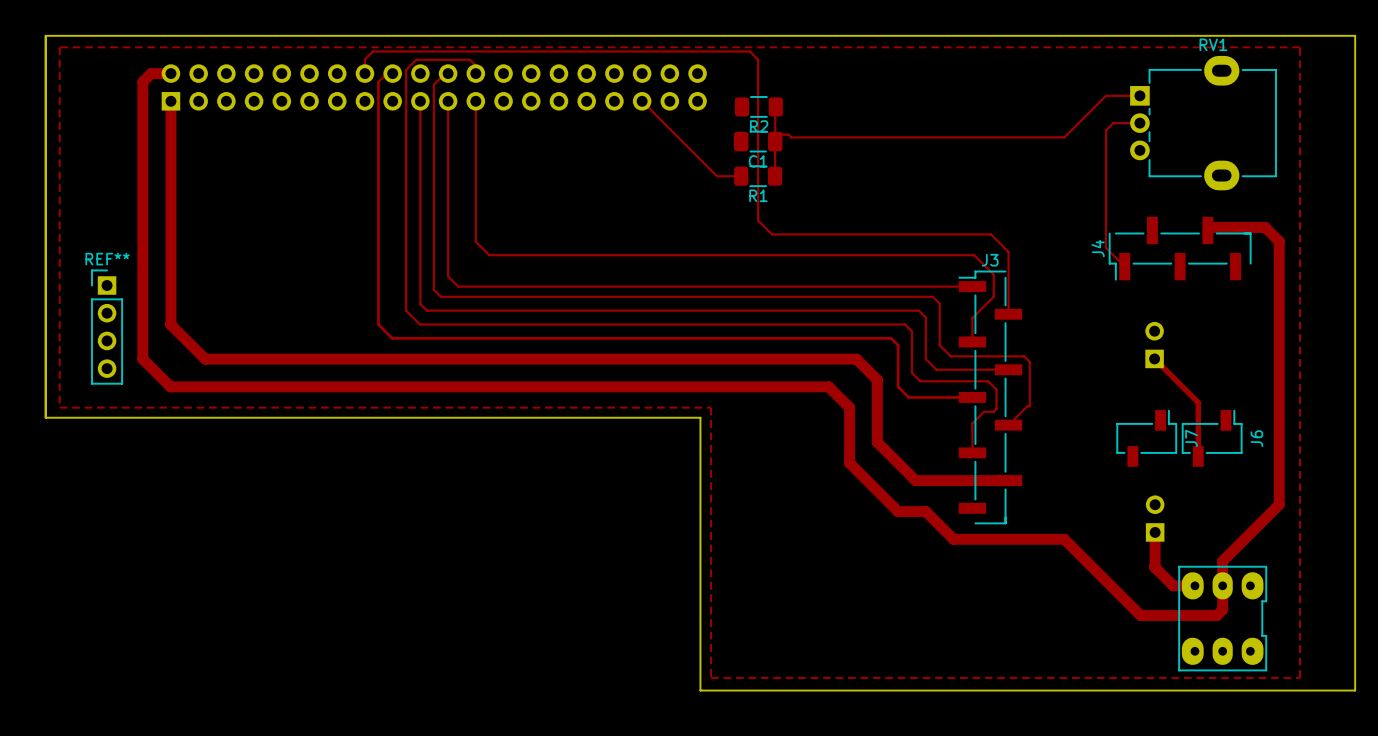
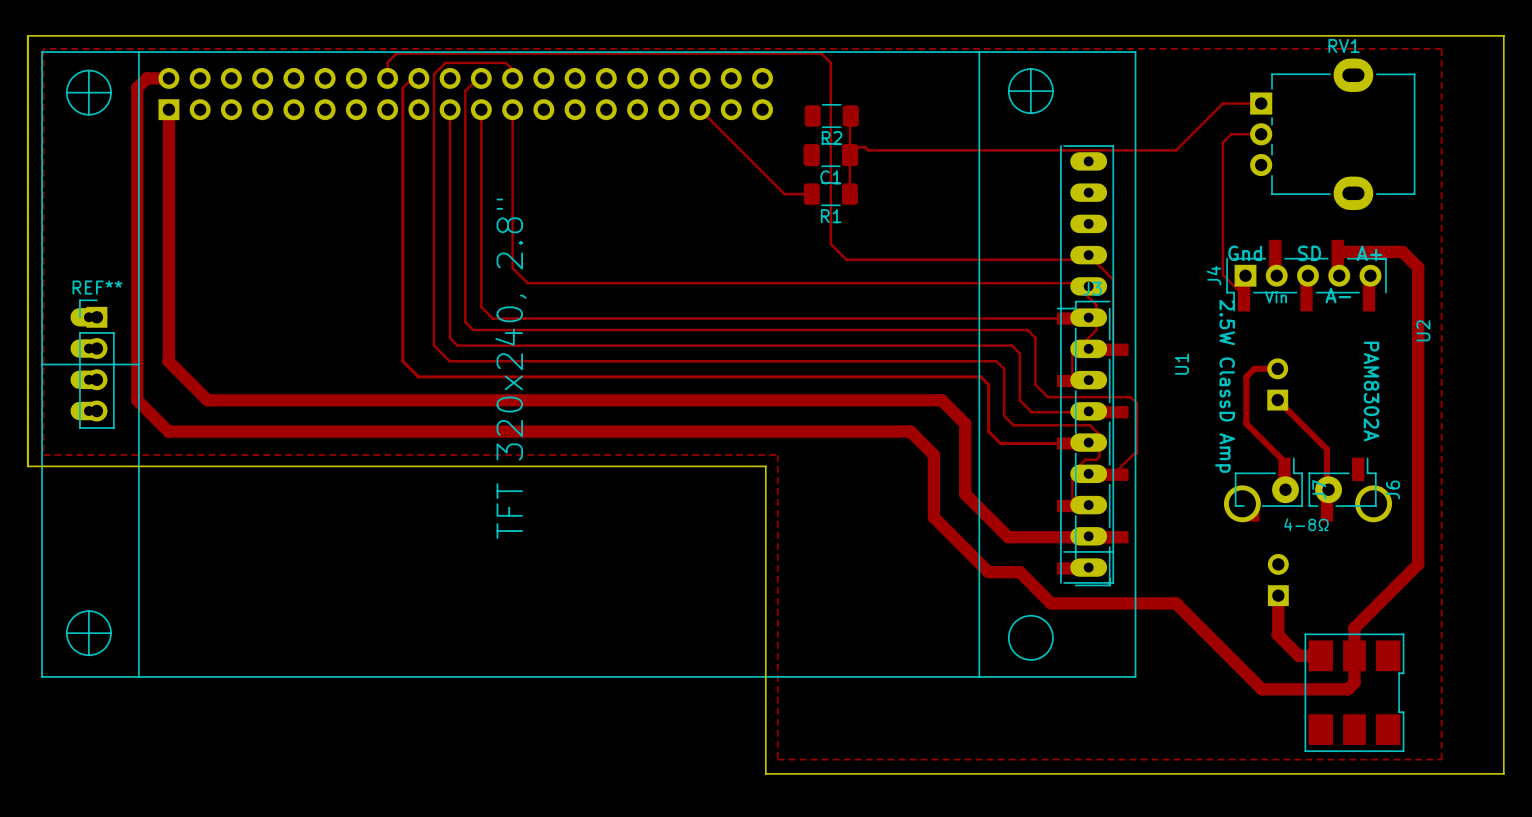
U1: none -> (588, 364)
track: none -> (1277, 368) (1254, 368) (1246, 376) (1246, 423) (1284, 461) (1284, 469)
U2: none -> (1307, 393)
part footprint: [1178, 566, 1267, 672] -> [1304, 633, 1405, 752]

